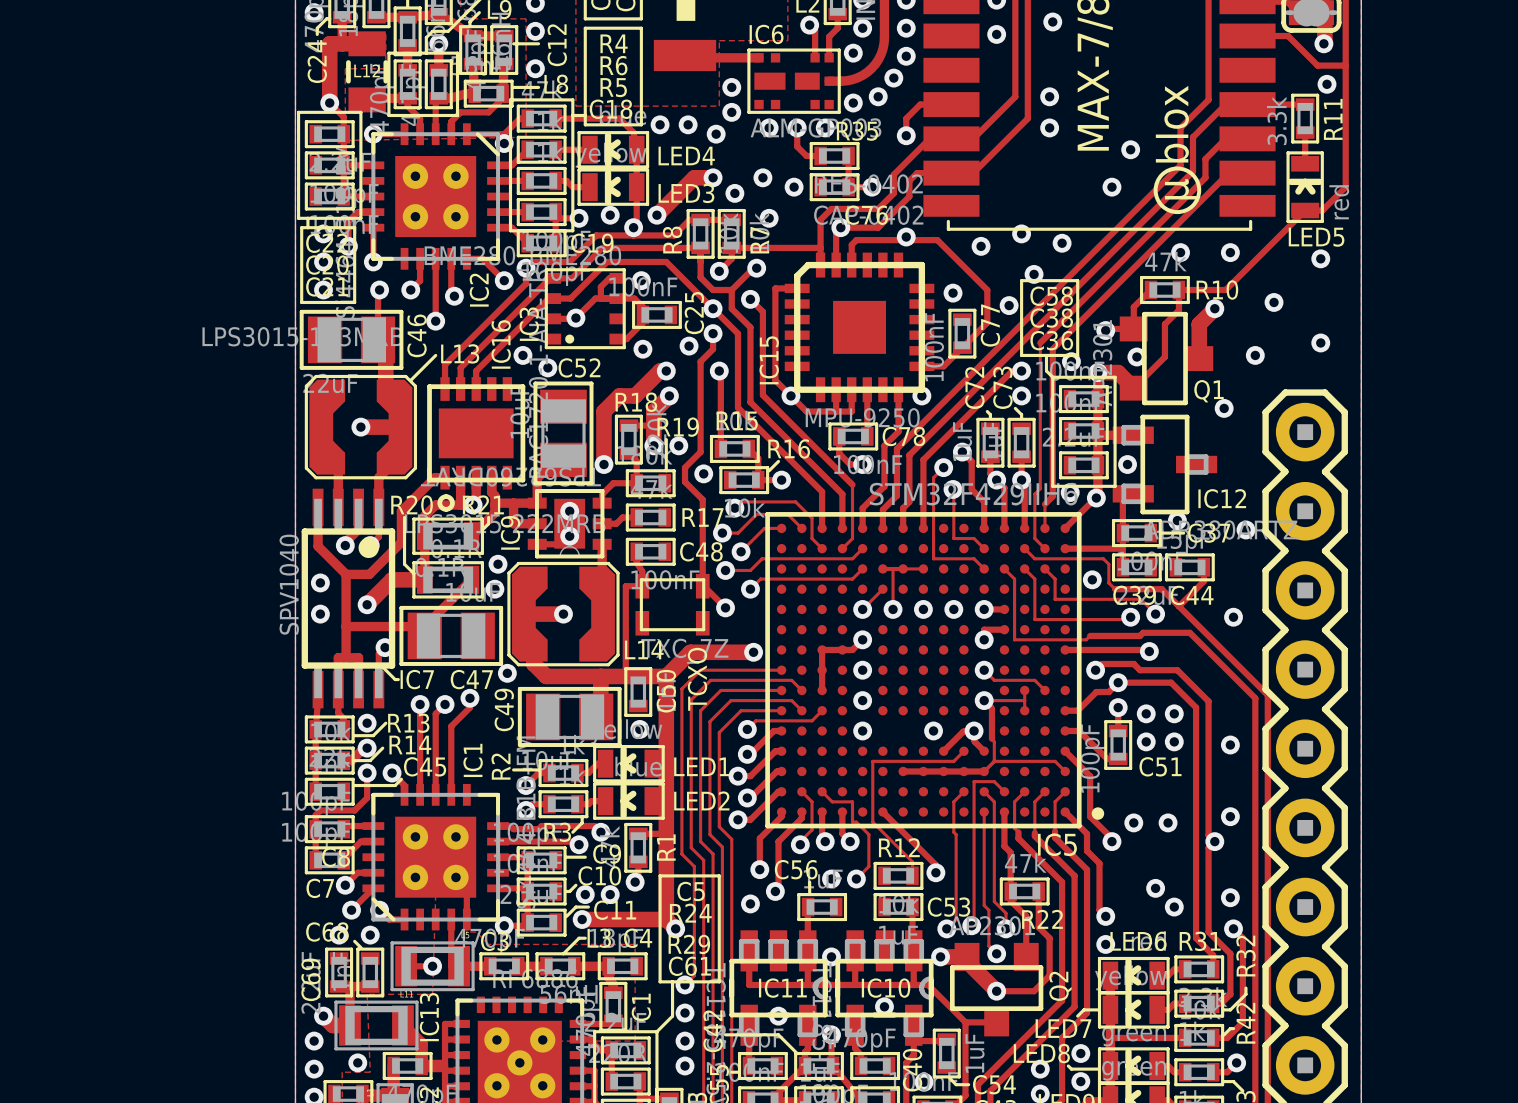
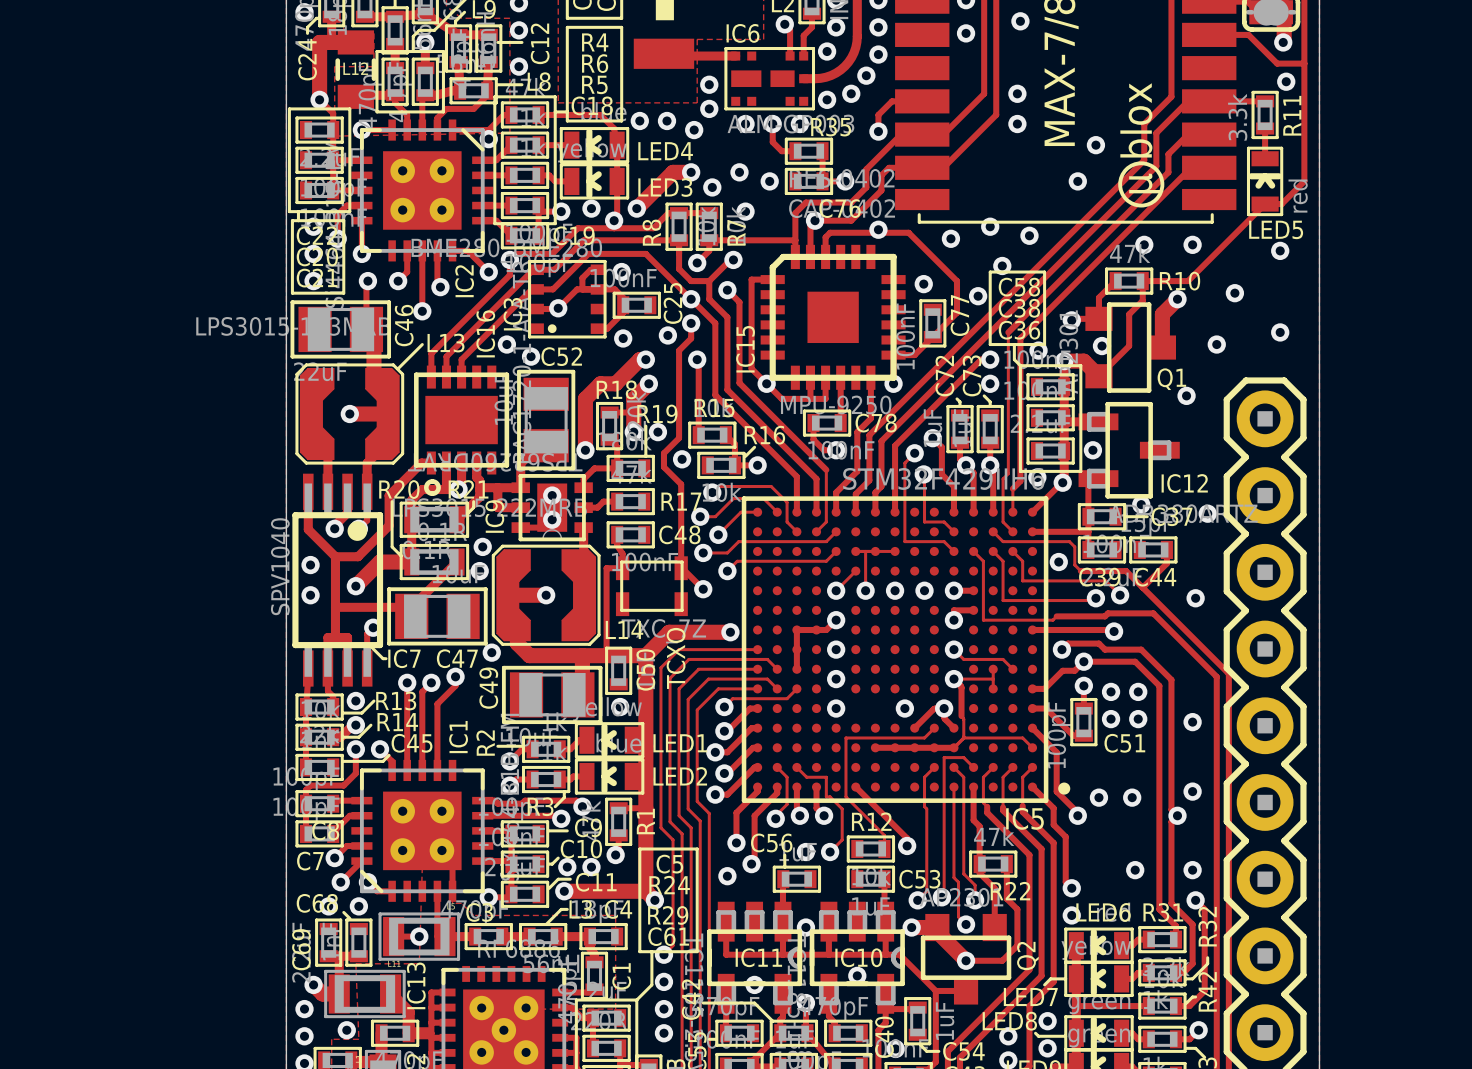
via: (1155, 888) -> none
via: none -> (1135, 870)
via: (1174, 907) -> none

